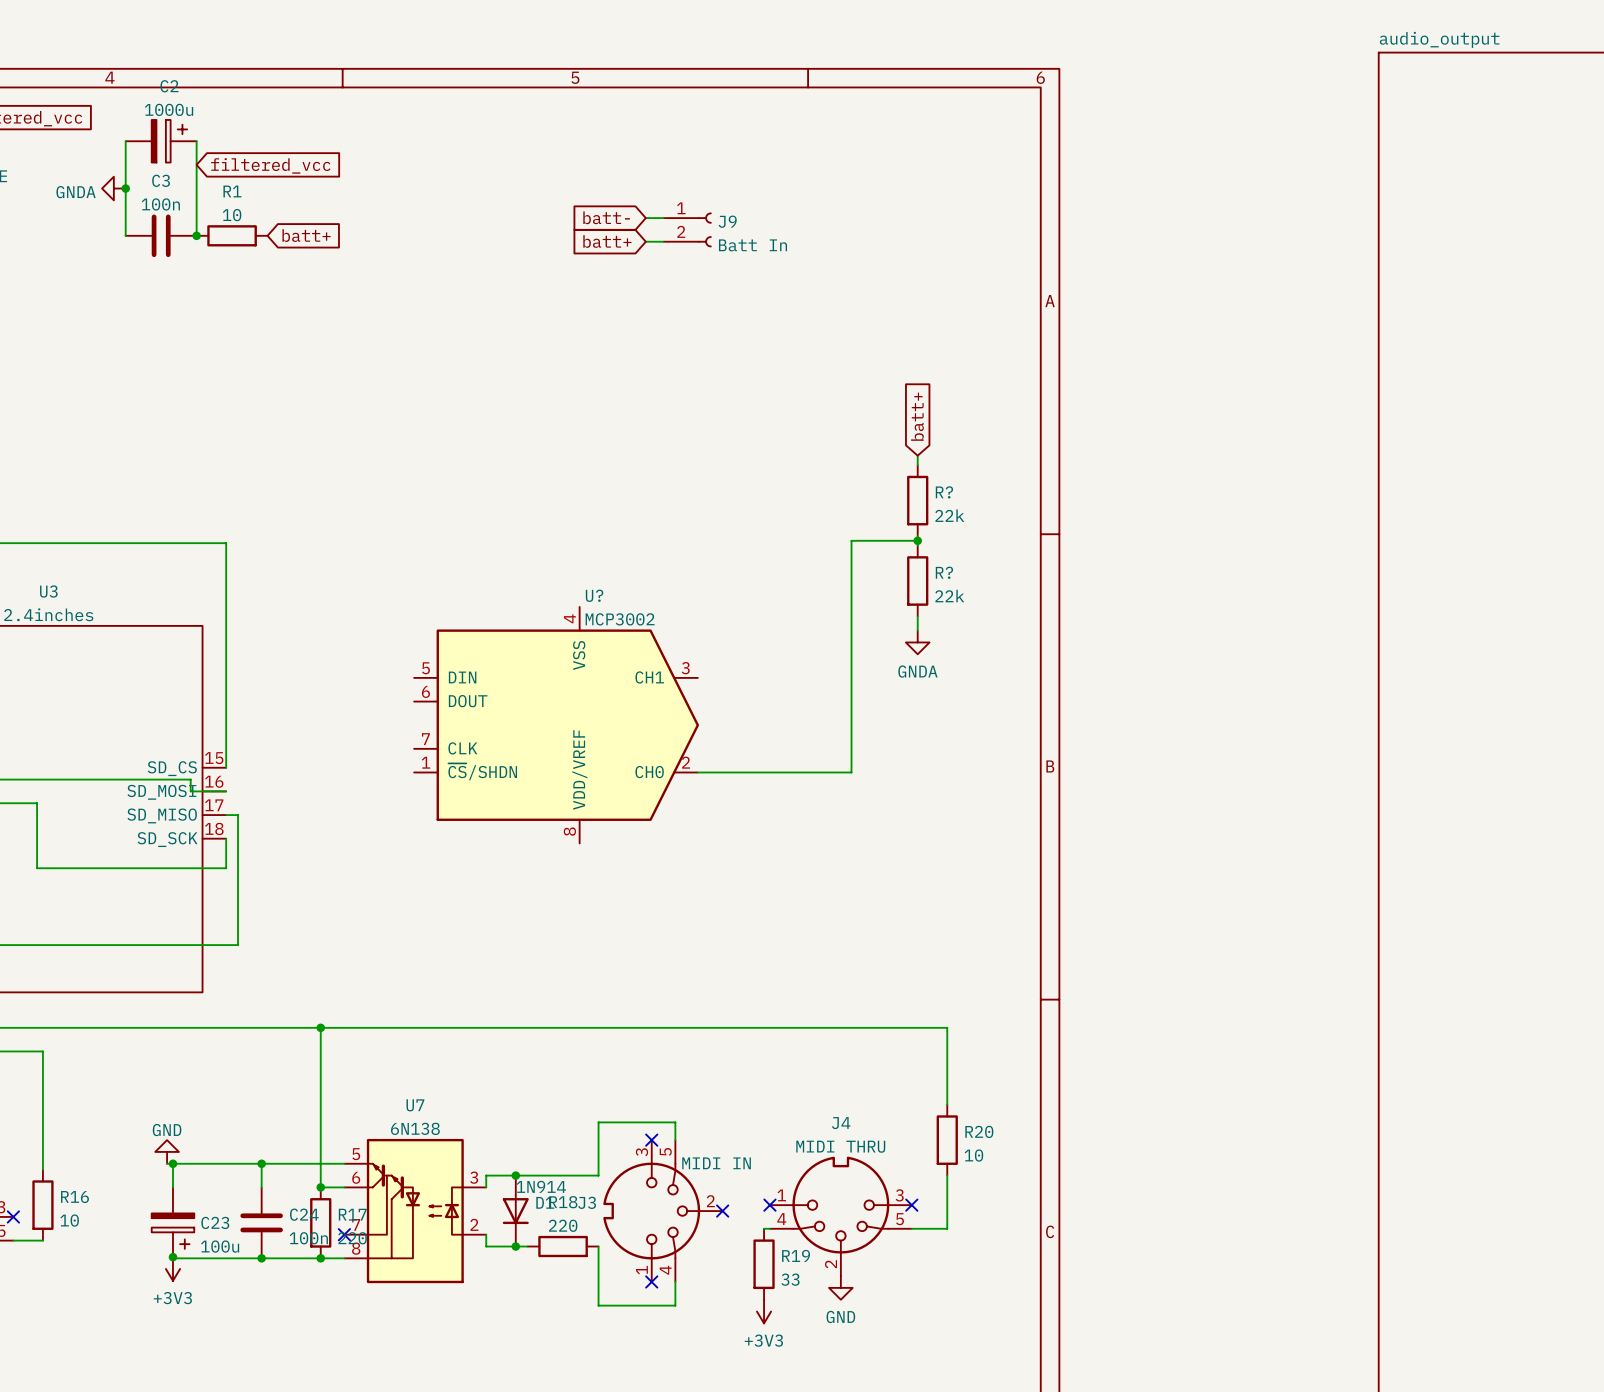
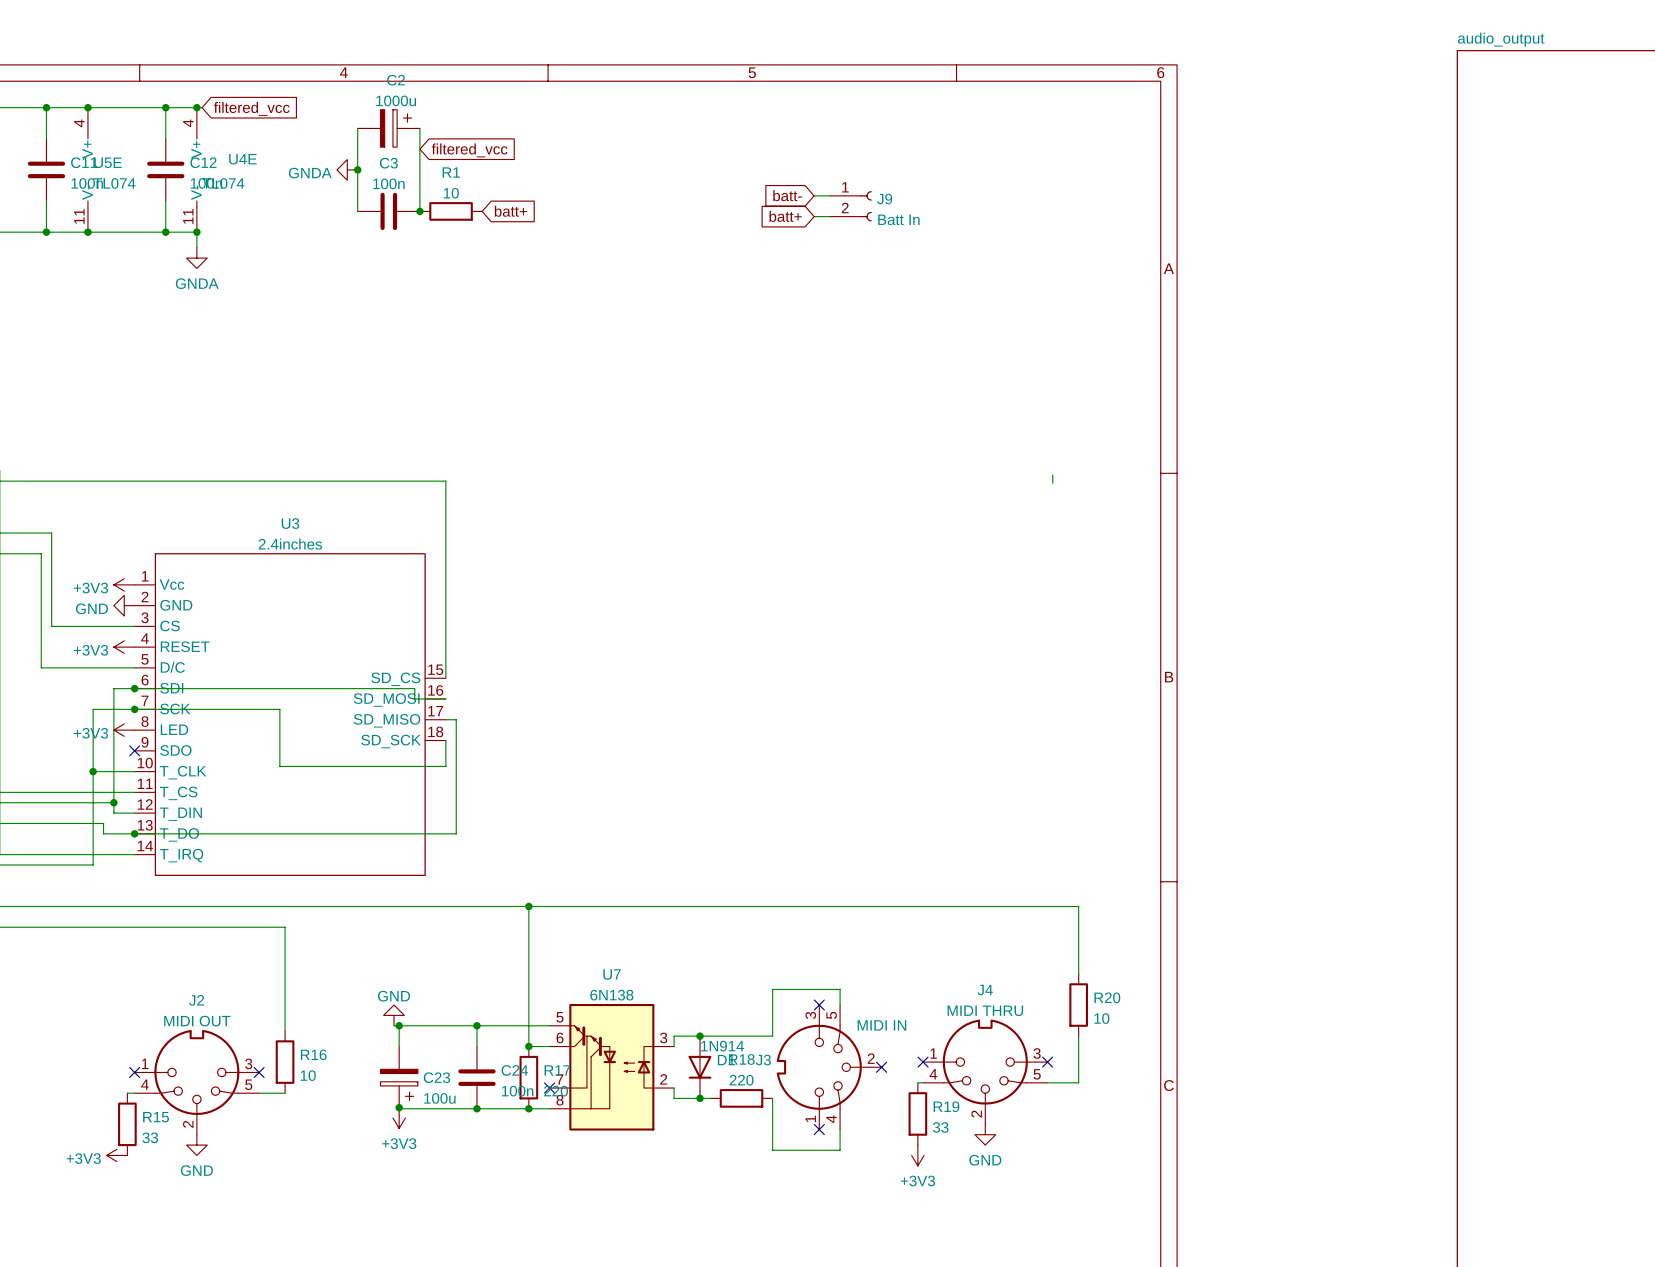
global label: batt+ (917, 416) -> none
wire: (917, 455) (917, 465) -> none
R?: 22k (917, 500) -> none
wire: (917, 540) (851, 540) (851, 772) (697, 772) -> none
junction: (917, 540) -> none
R?: 22k (917, 580) -> none
wire: (917, 616) (917, 630) -> none
power symbol: GNDA (917, 642) -> none
U?: MCP3002 (556, 725) -> none

